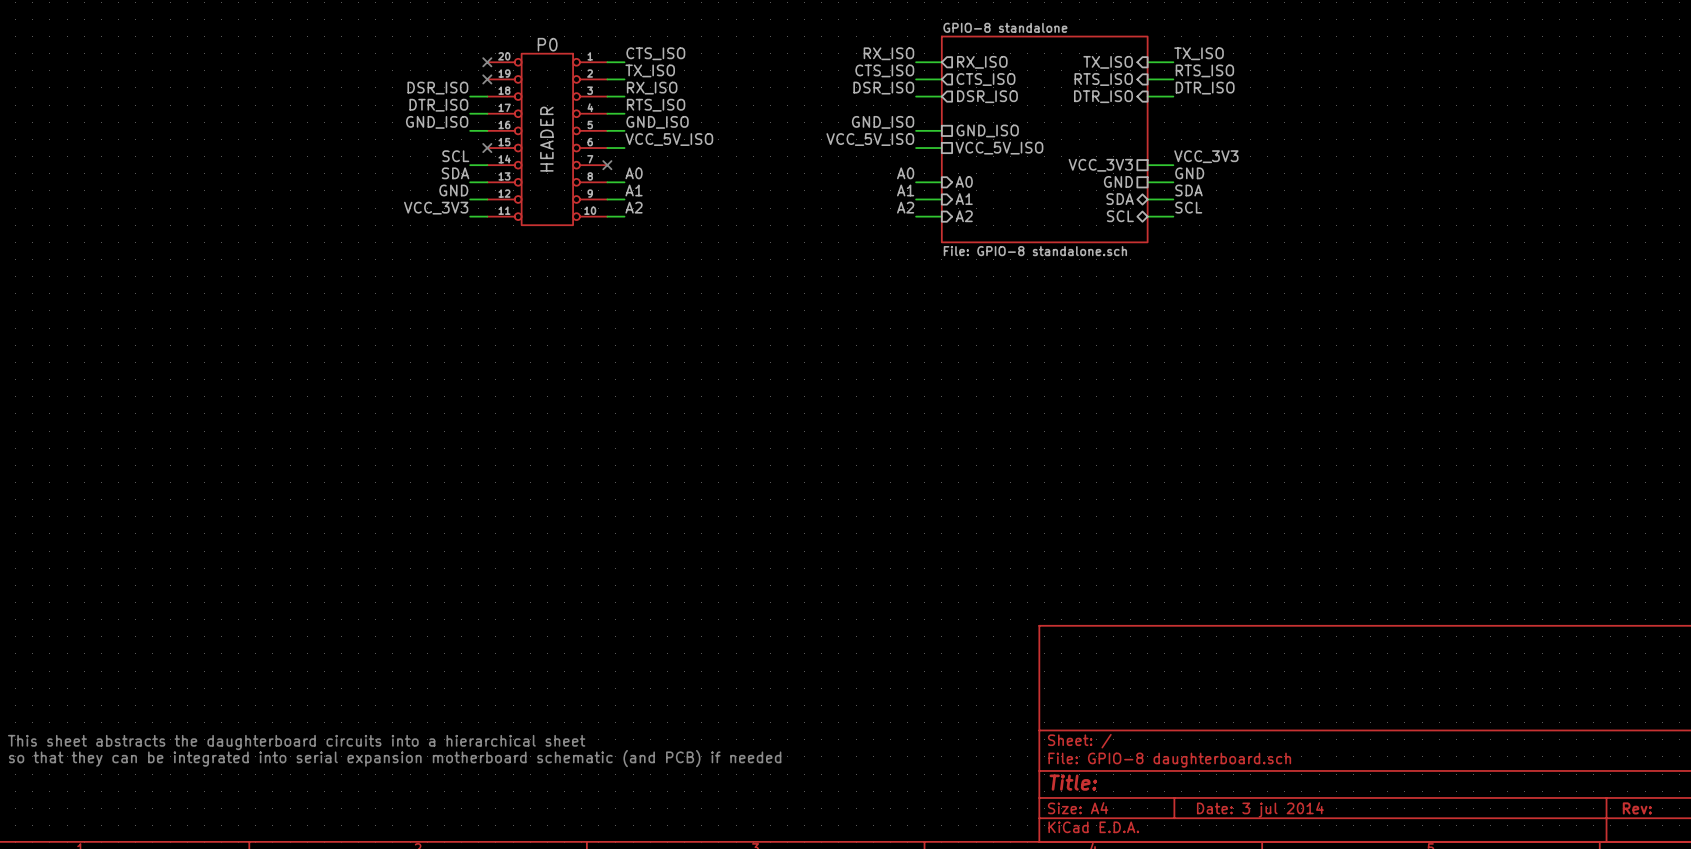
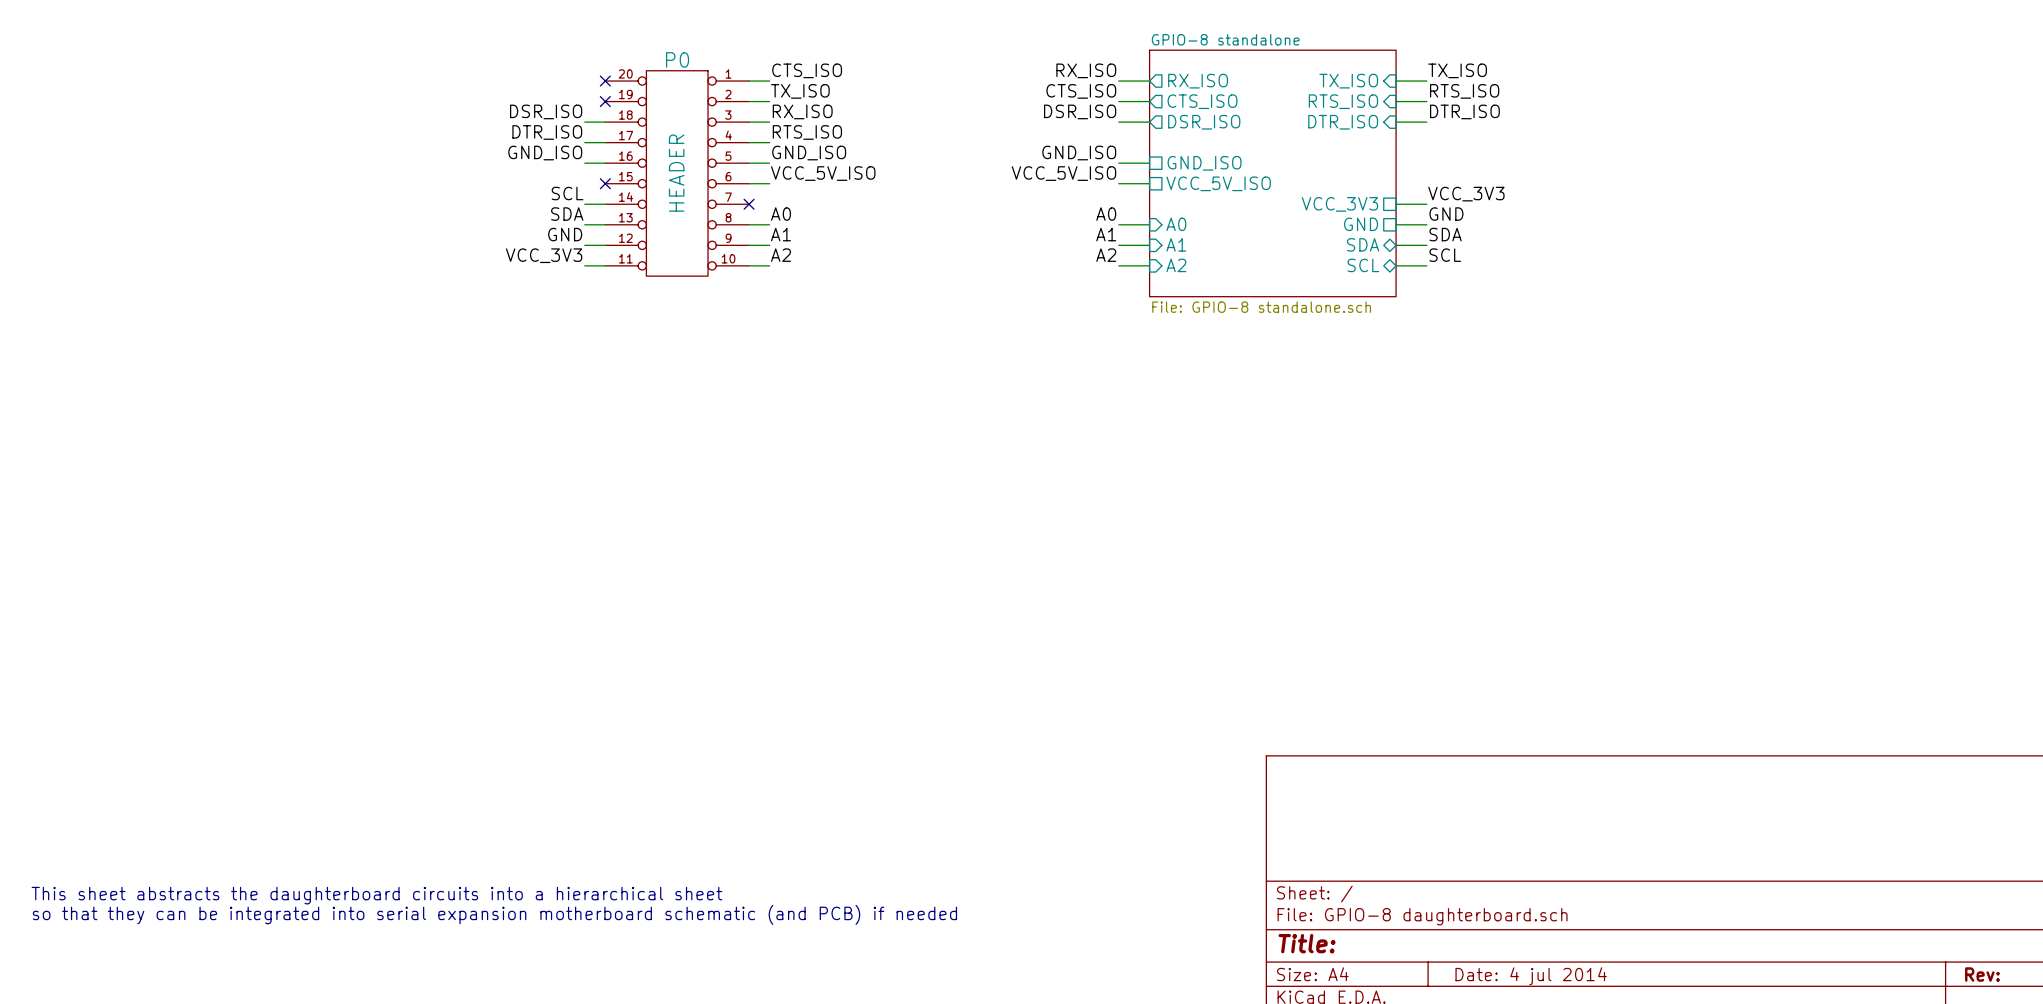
title block: Date: 3 jul 2014 (1260, 809) -> Date: 4 jul 2014 (1531, 976)

